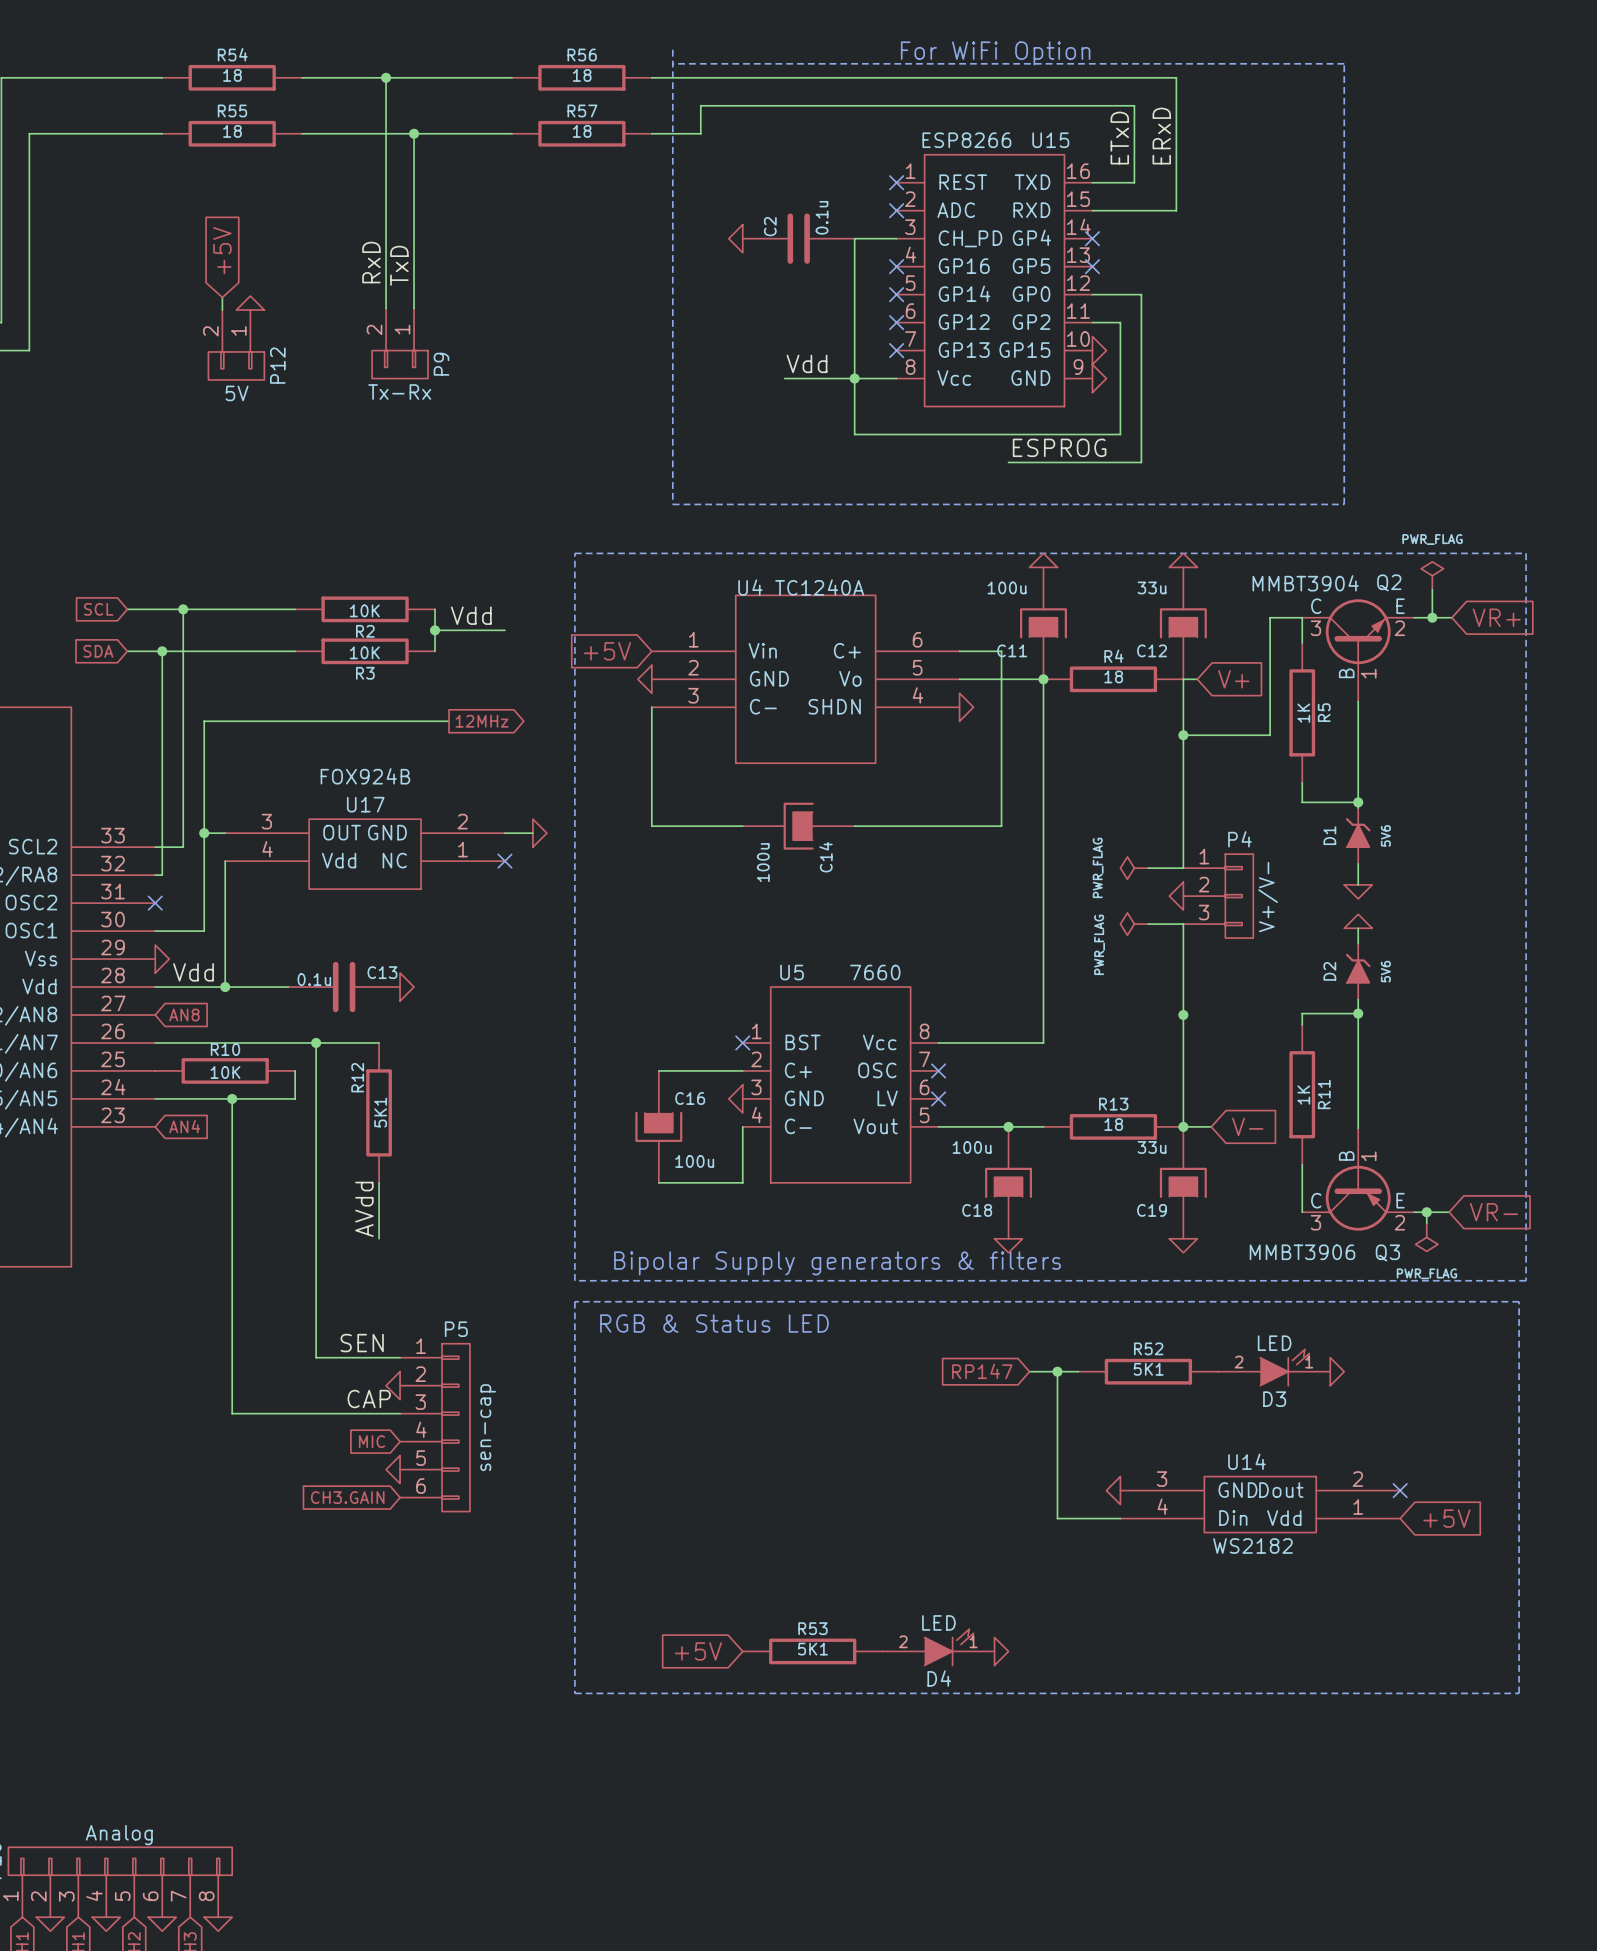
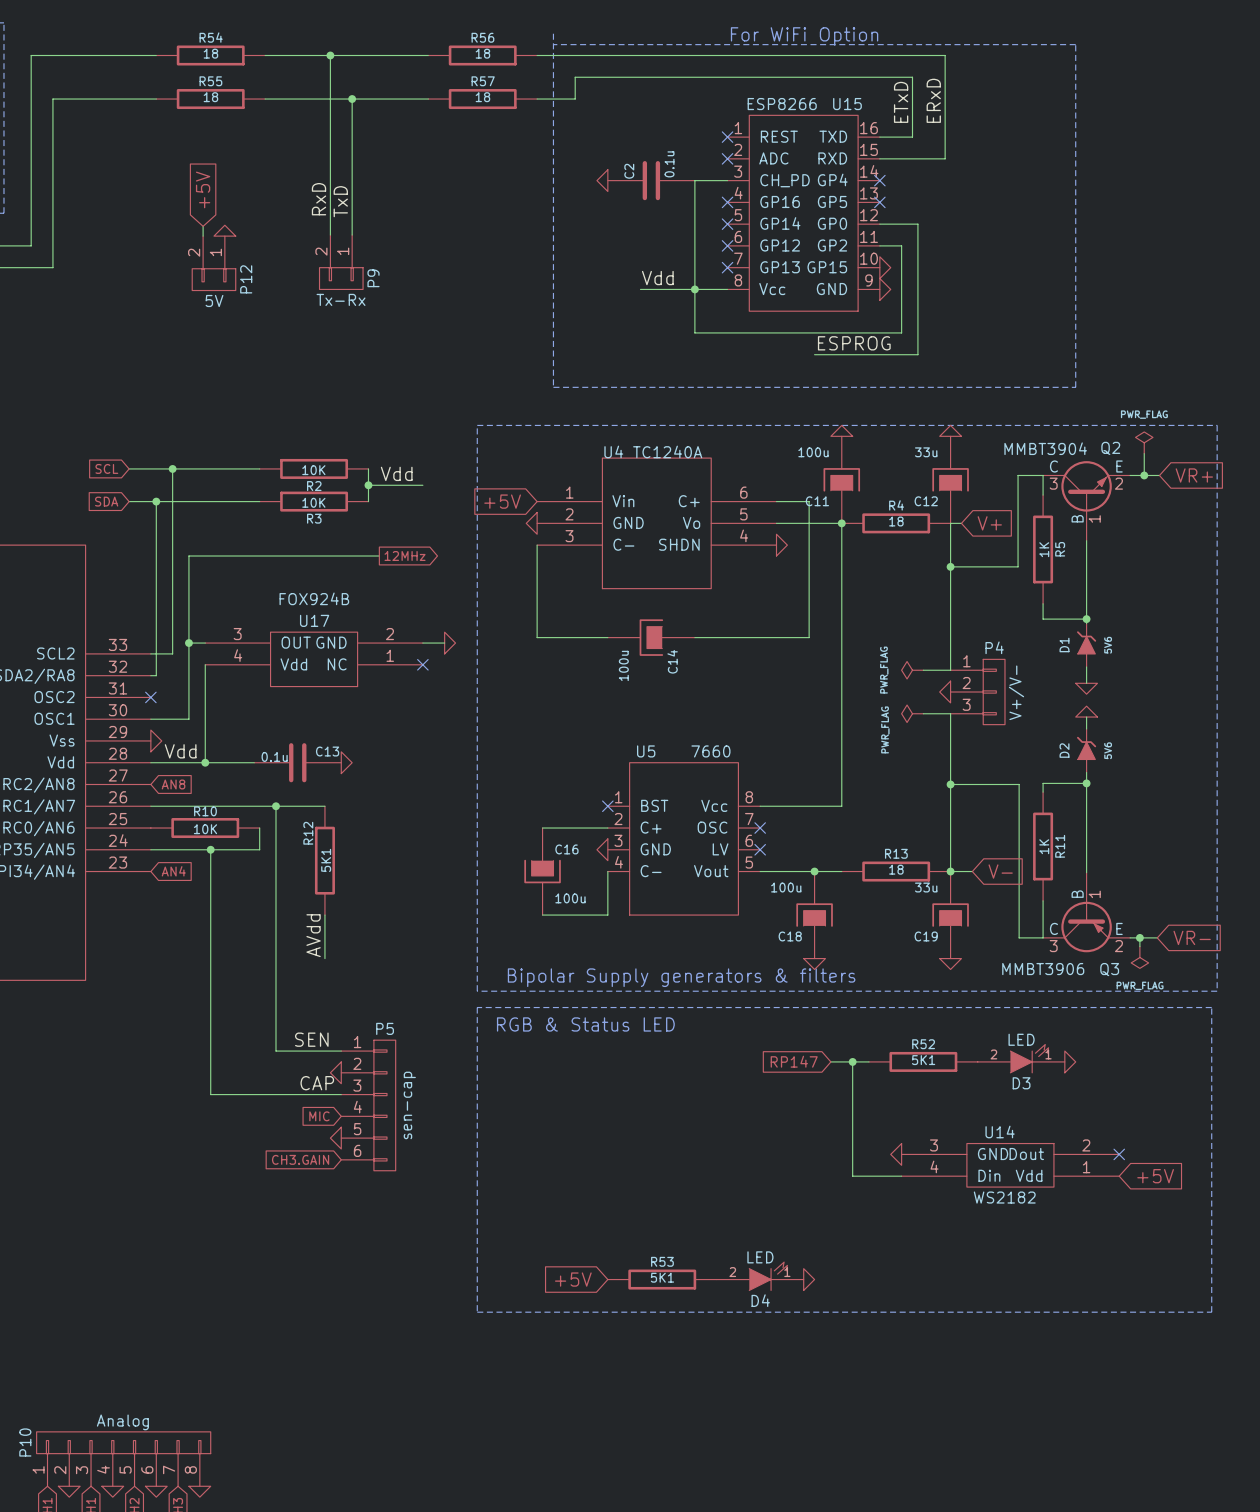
wire: none -> (950, 784) (1019, 784) (1019, 937) (1043, 937)

